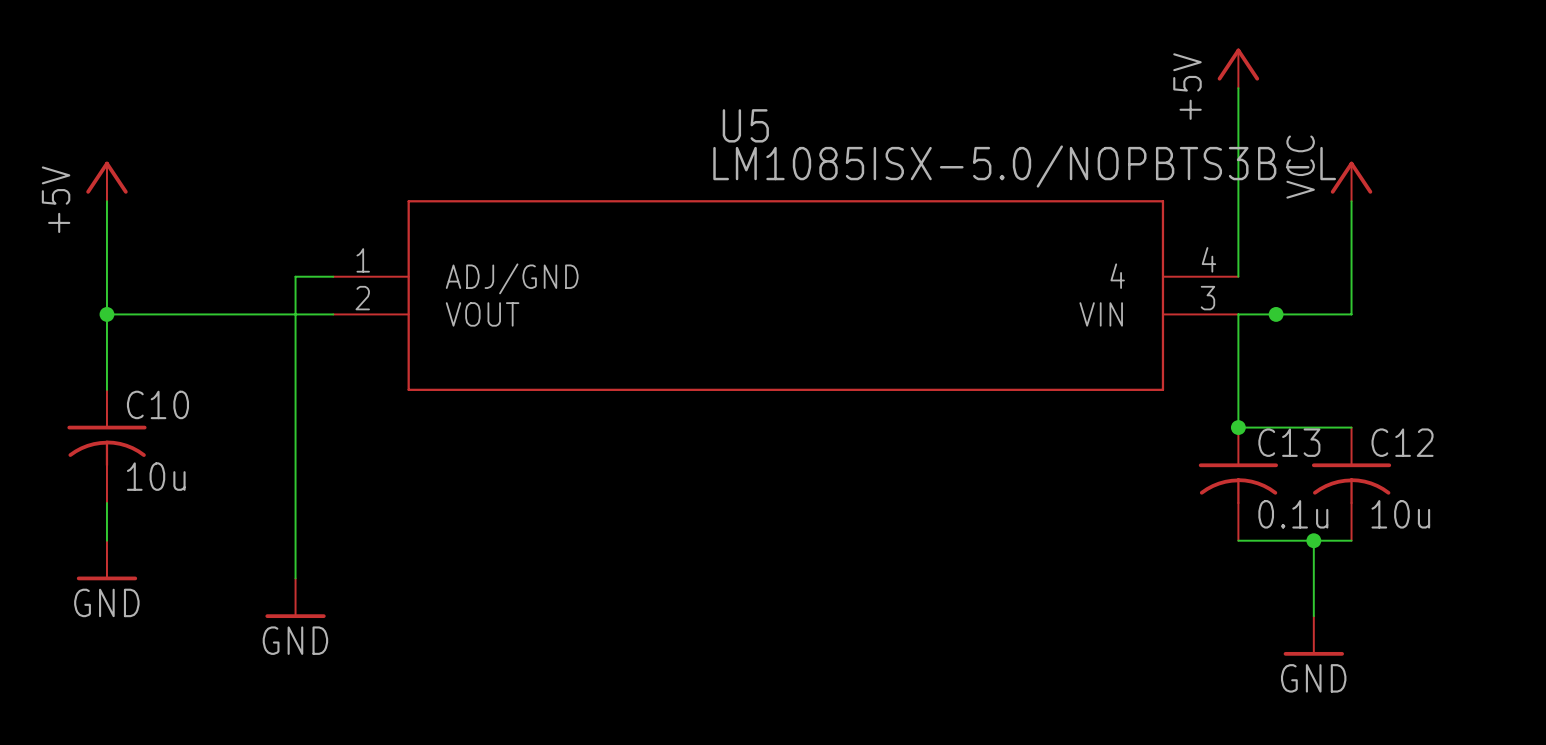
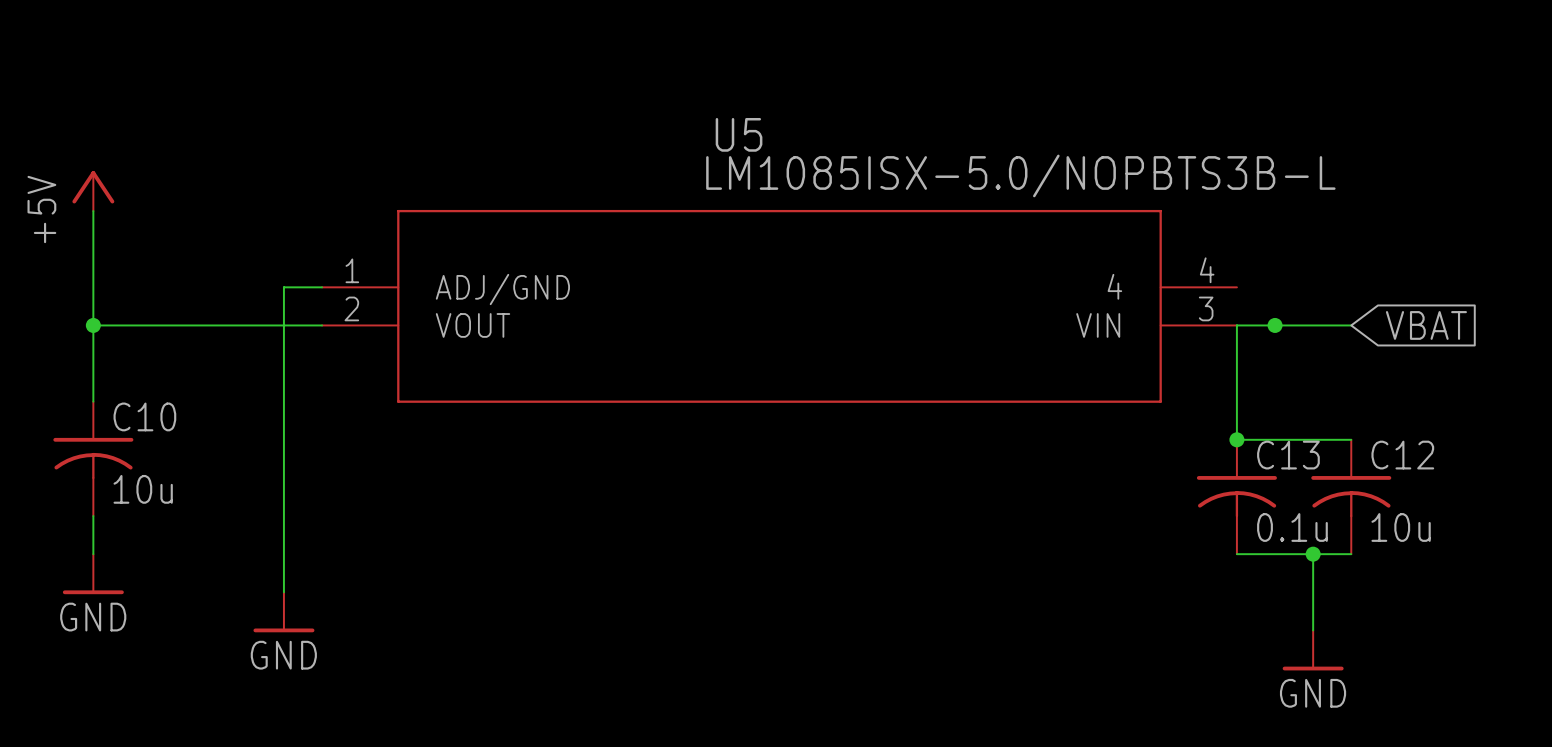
power symbol: +5V (1238, 68) -> none
wire: (1238, 88) (1238, 276) -> none
power symbol: VCC (1351, 181) -> none
wire: (1351, 201) (1351, 314) -> none
global label: none -> VBAT (1426, 325)

